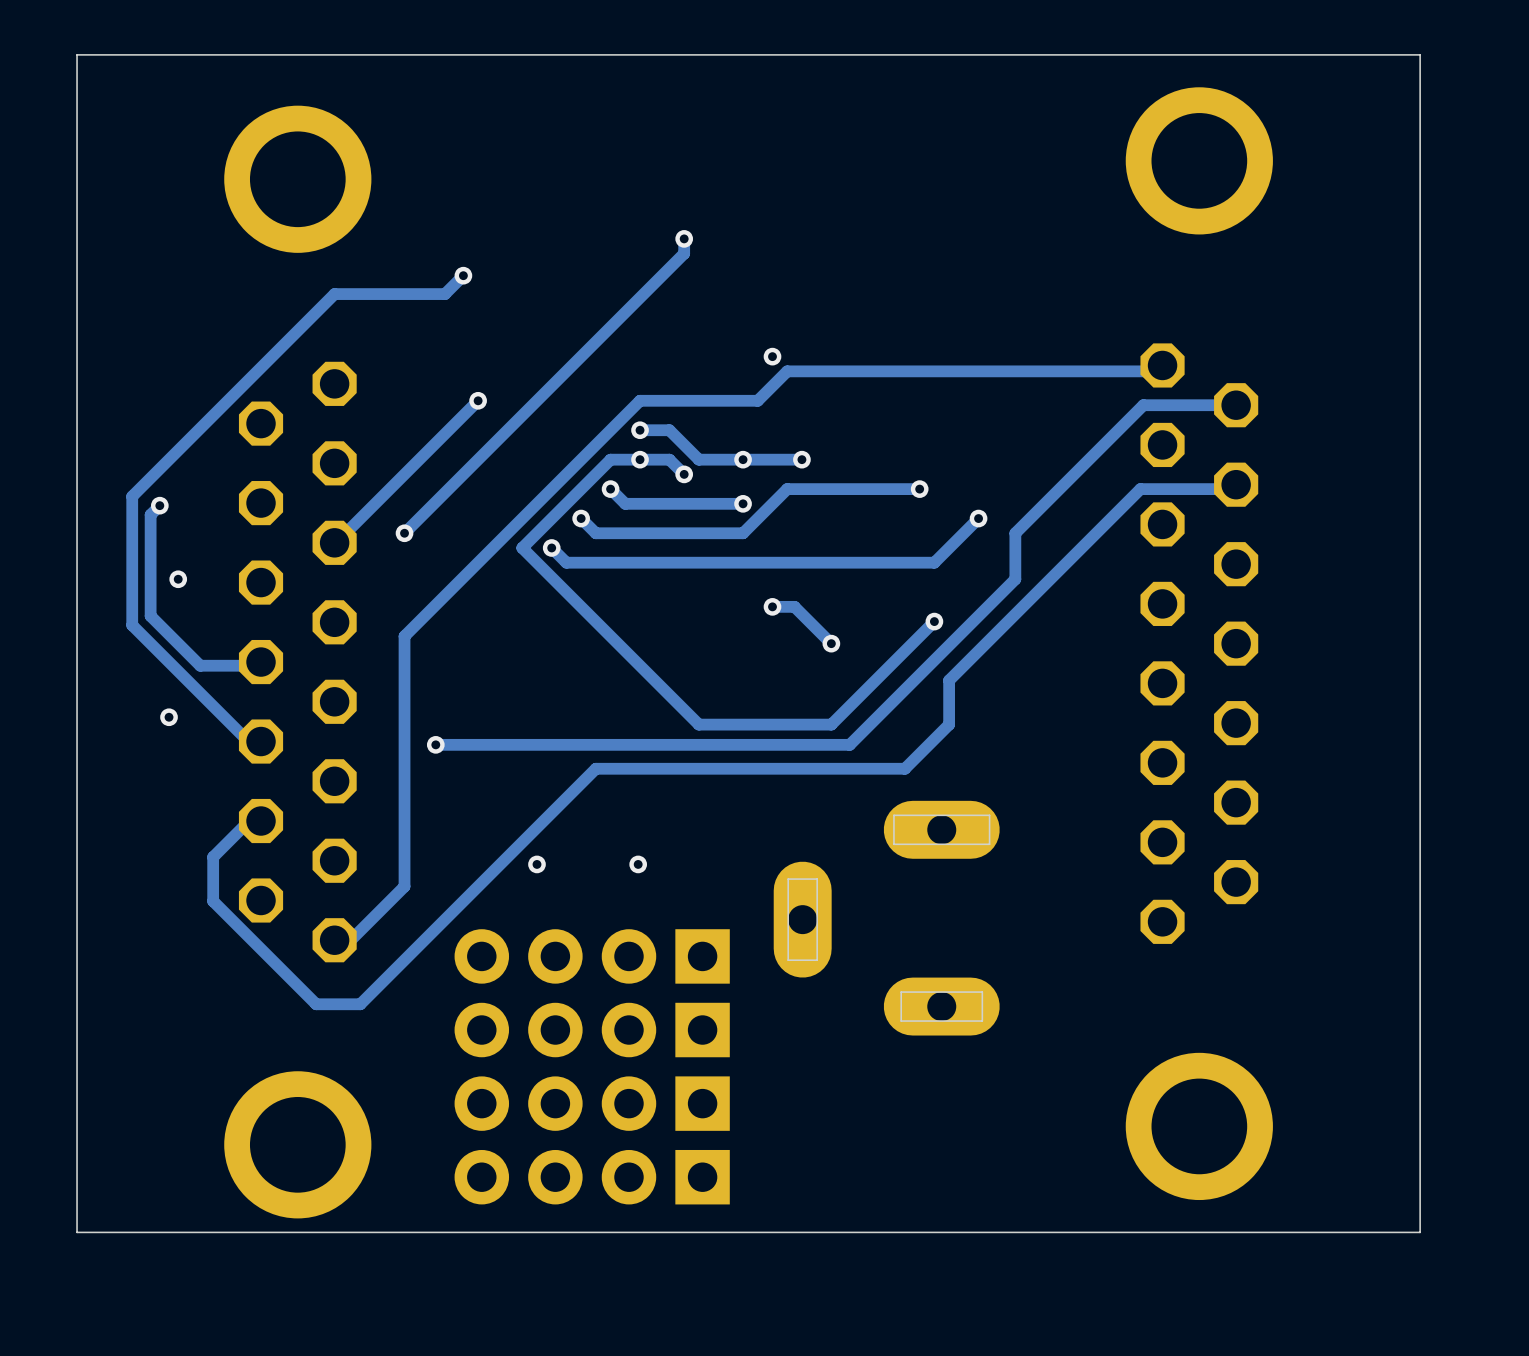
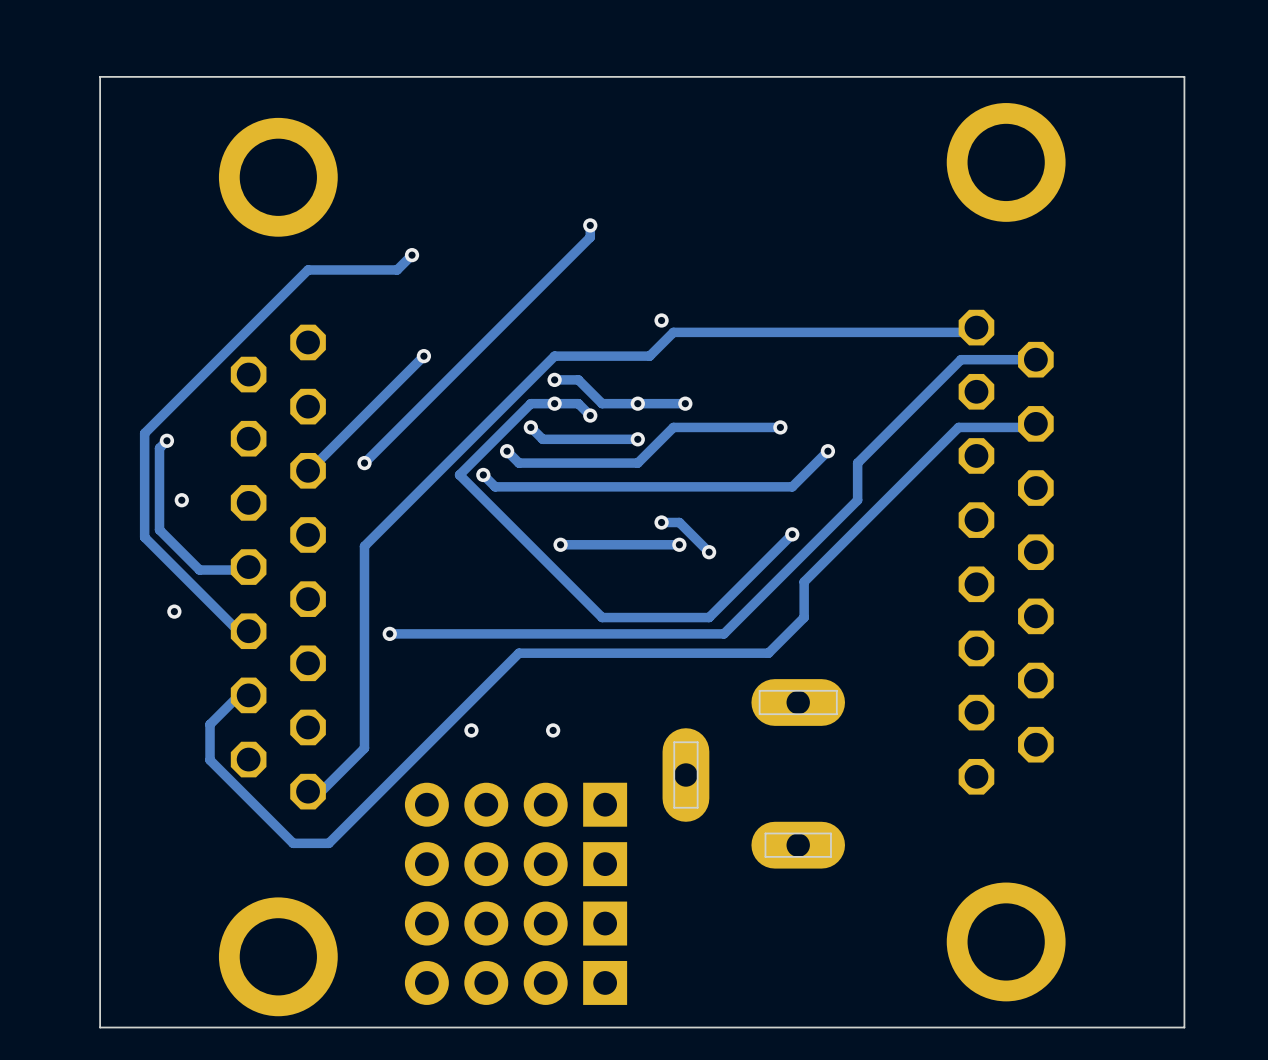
via: none -> (560, 544)
track: none -> (679, 544) (560, 544)
via: none -> (679, 544)

